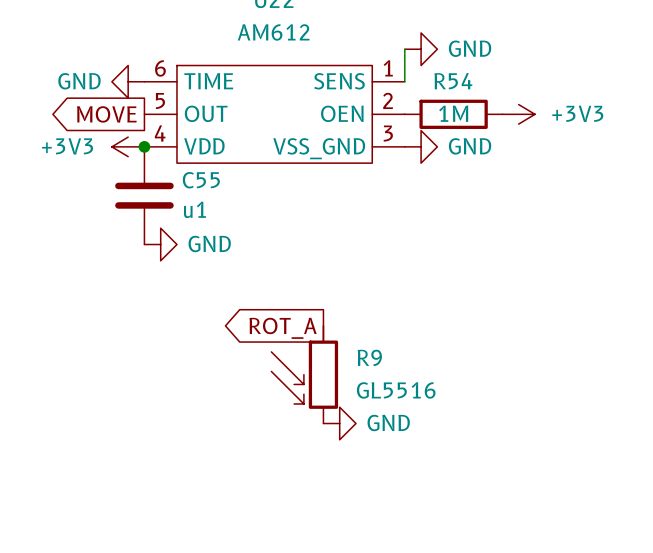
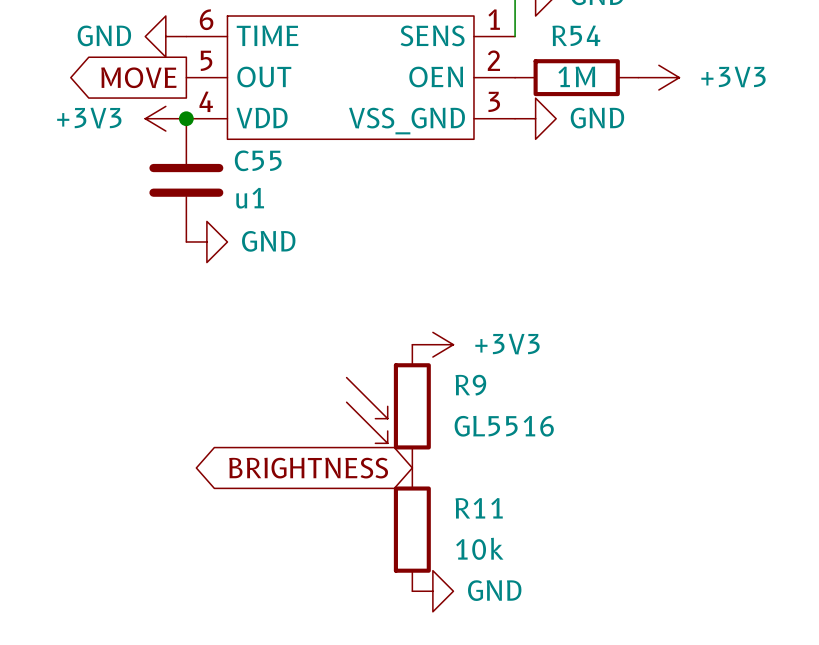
power symbol: none -> +3V3 (432, 344)
global label: ROT_A (283, 328) -> none
global label: none -> BRIGHTNESS (308, 468)
power symbol position: GND (339, 423) -> GND (432, 591)
R11: none -> 10k (412, 529)

